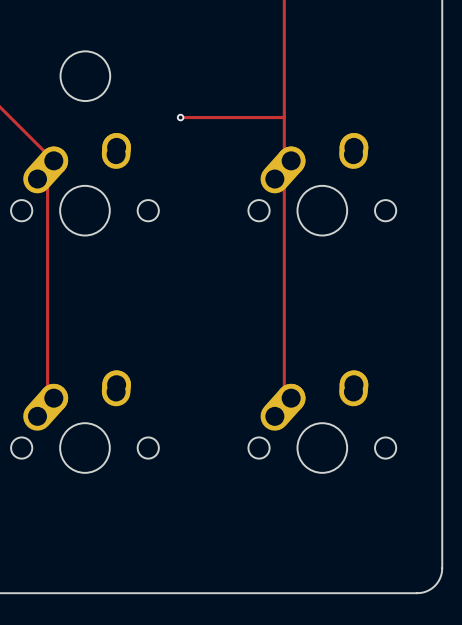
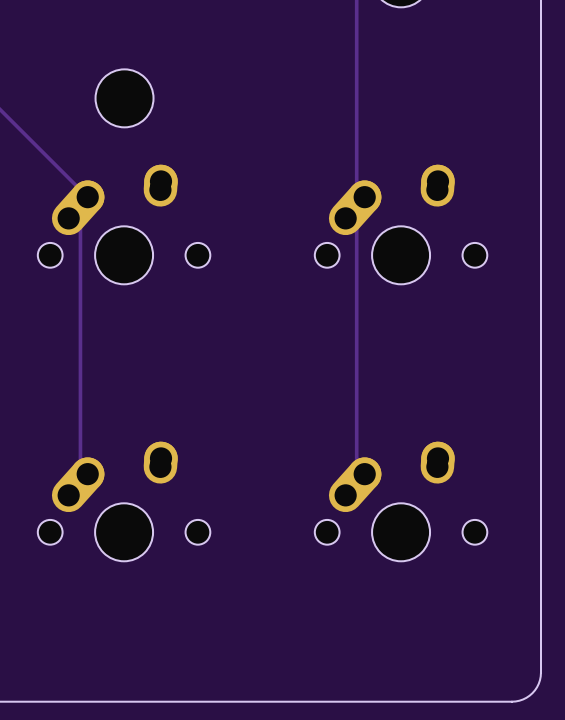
track: (180, 117) (284, 117) -> none
via: (180, 117) -> none

